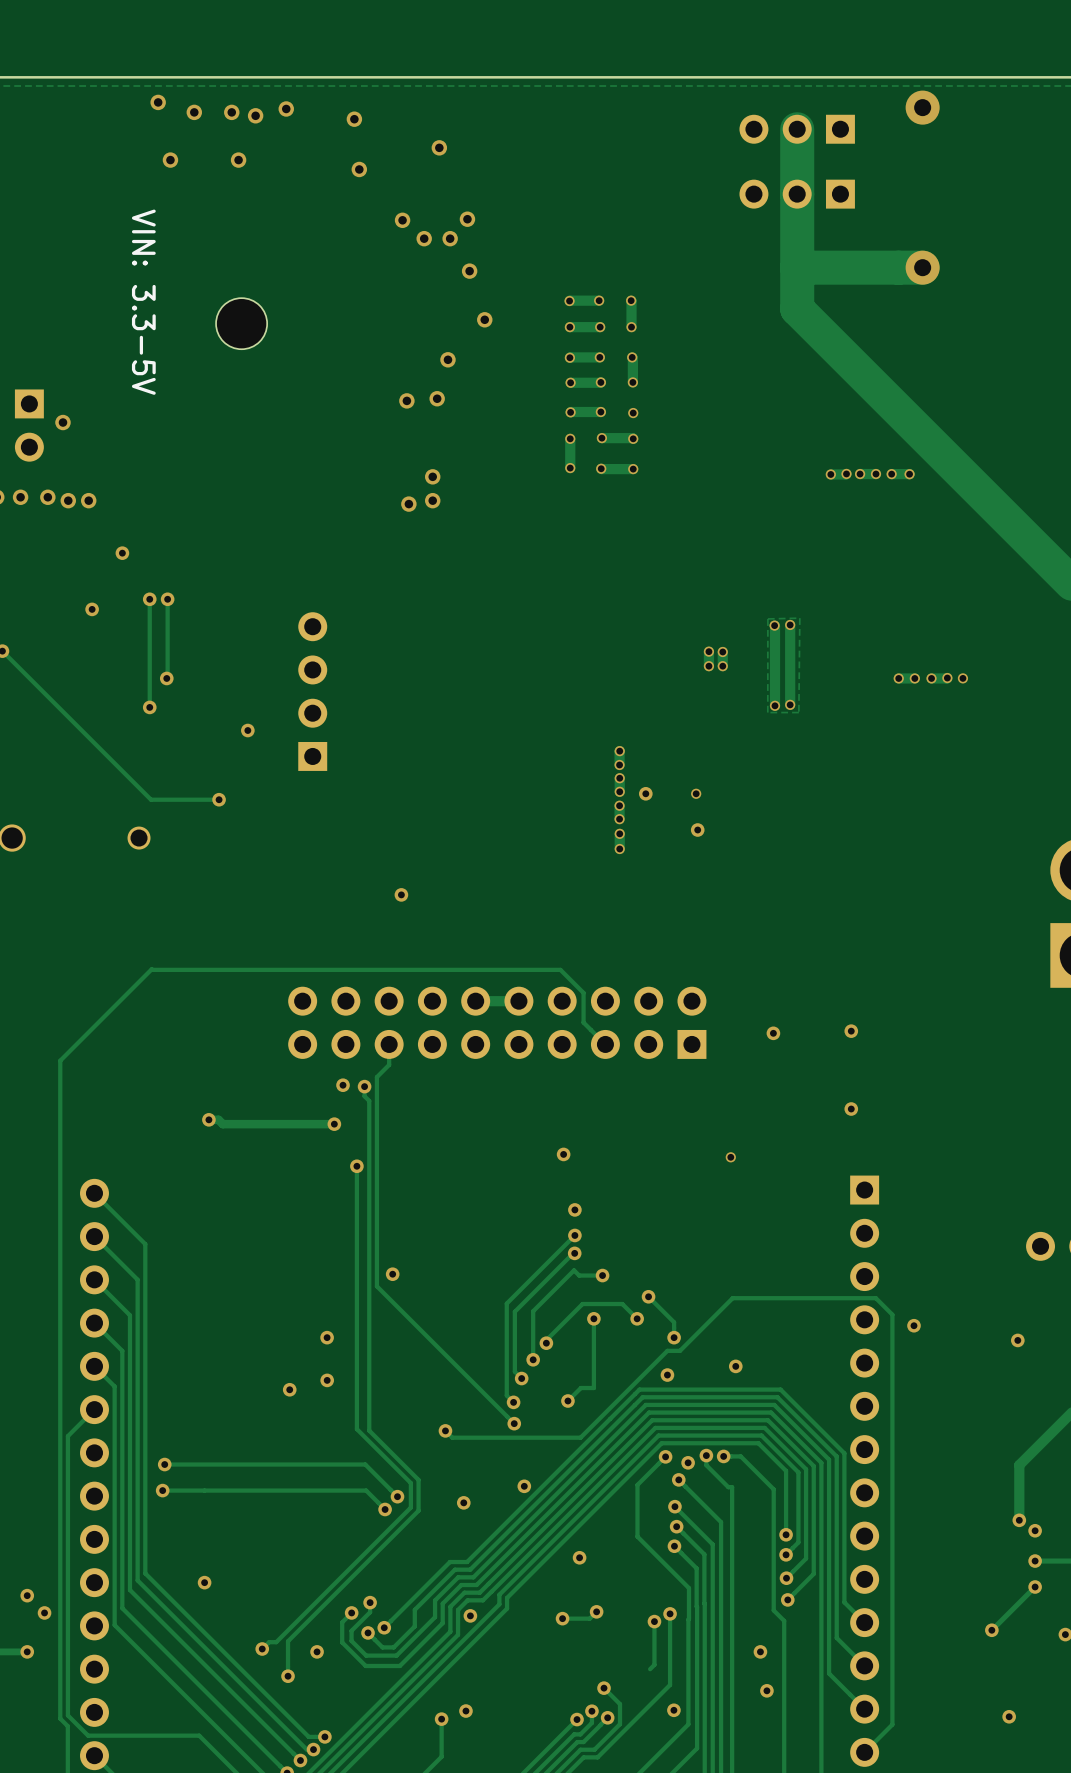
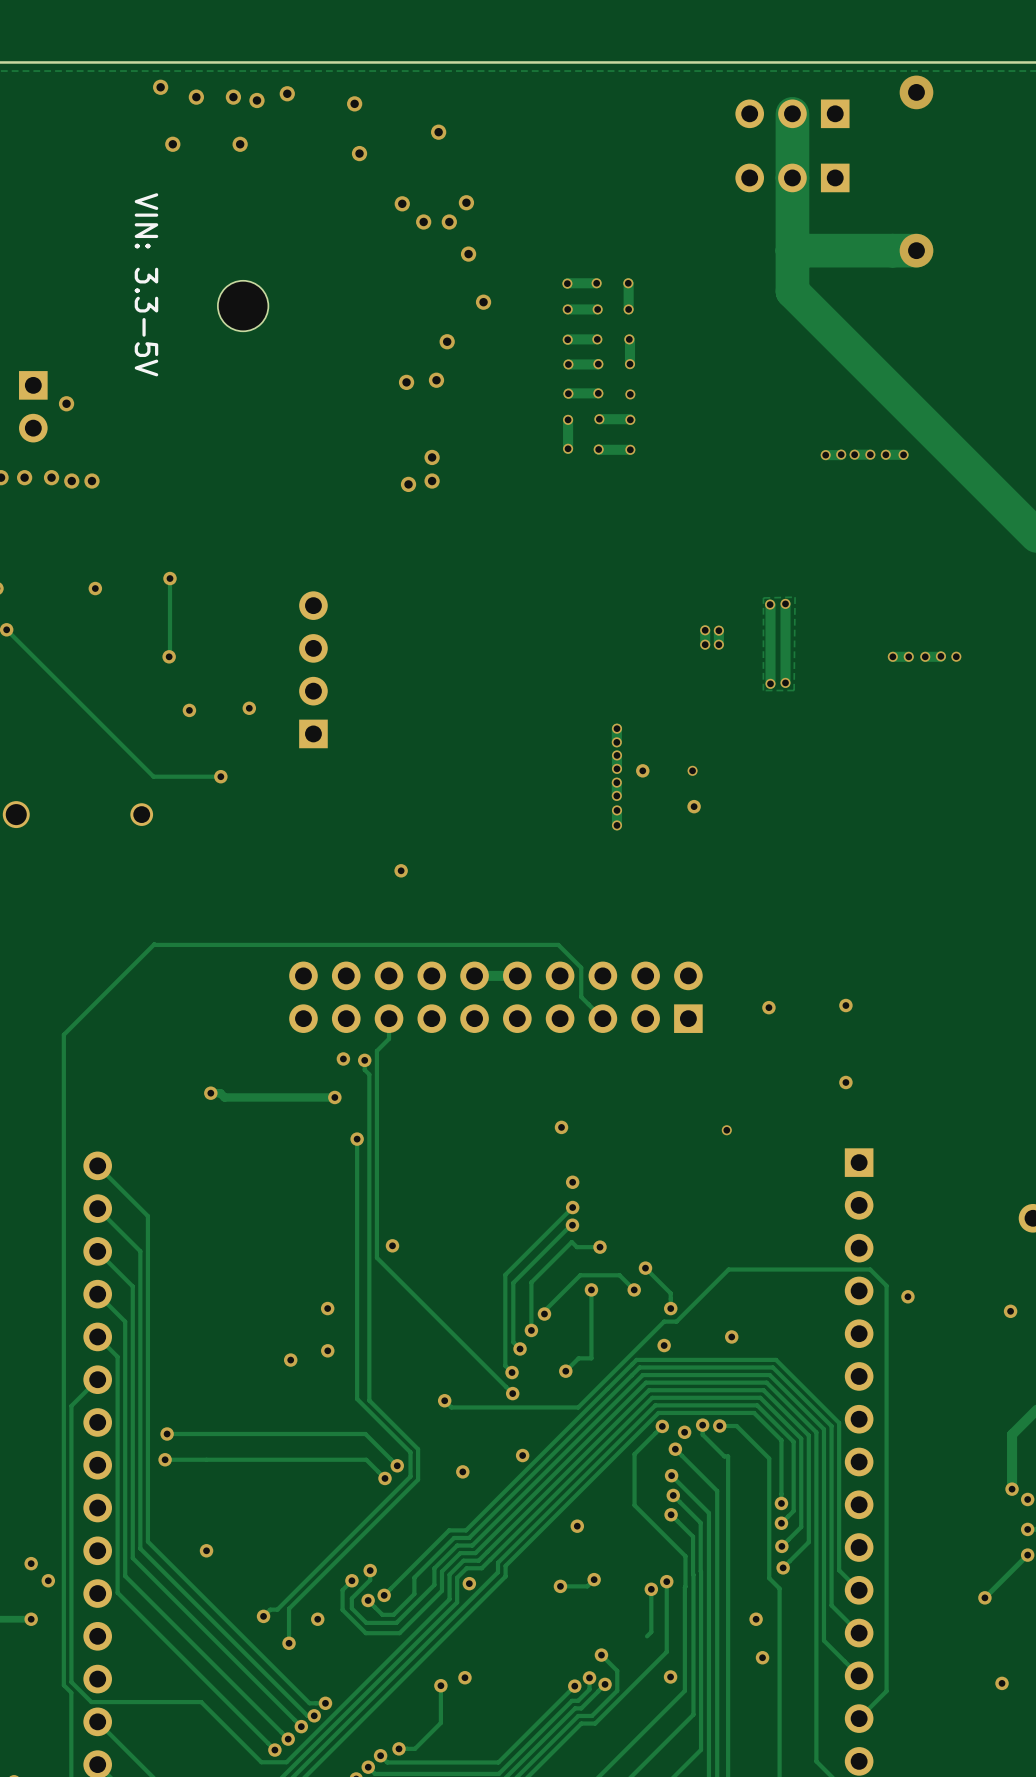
via: (122, 553) -> none
track: (149, 599) (149, 707) -> none
via: (149, 599) -> none
via position: (149, 707) -> (189, 710)

